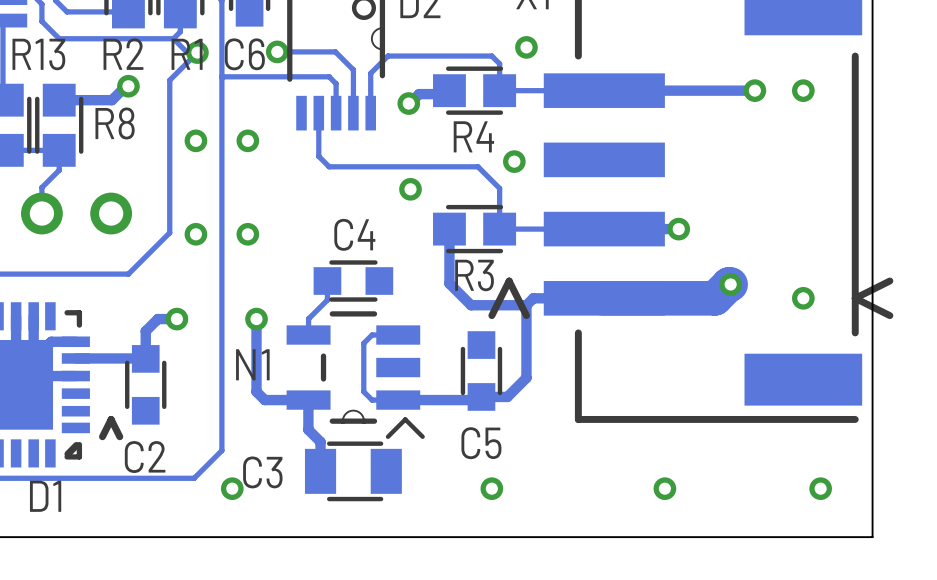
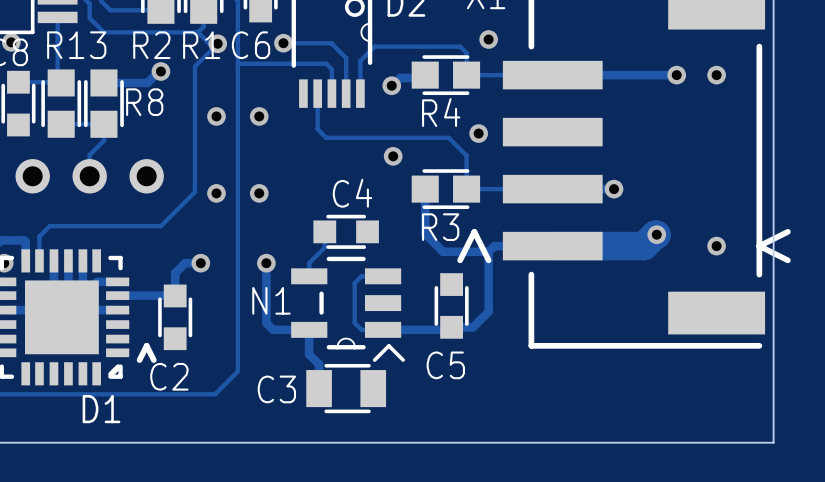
via: (232, 488) -> none
via: (491, 488) -> none
via: (664, 488) -> none
via: (820, 488) -> none

